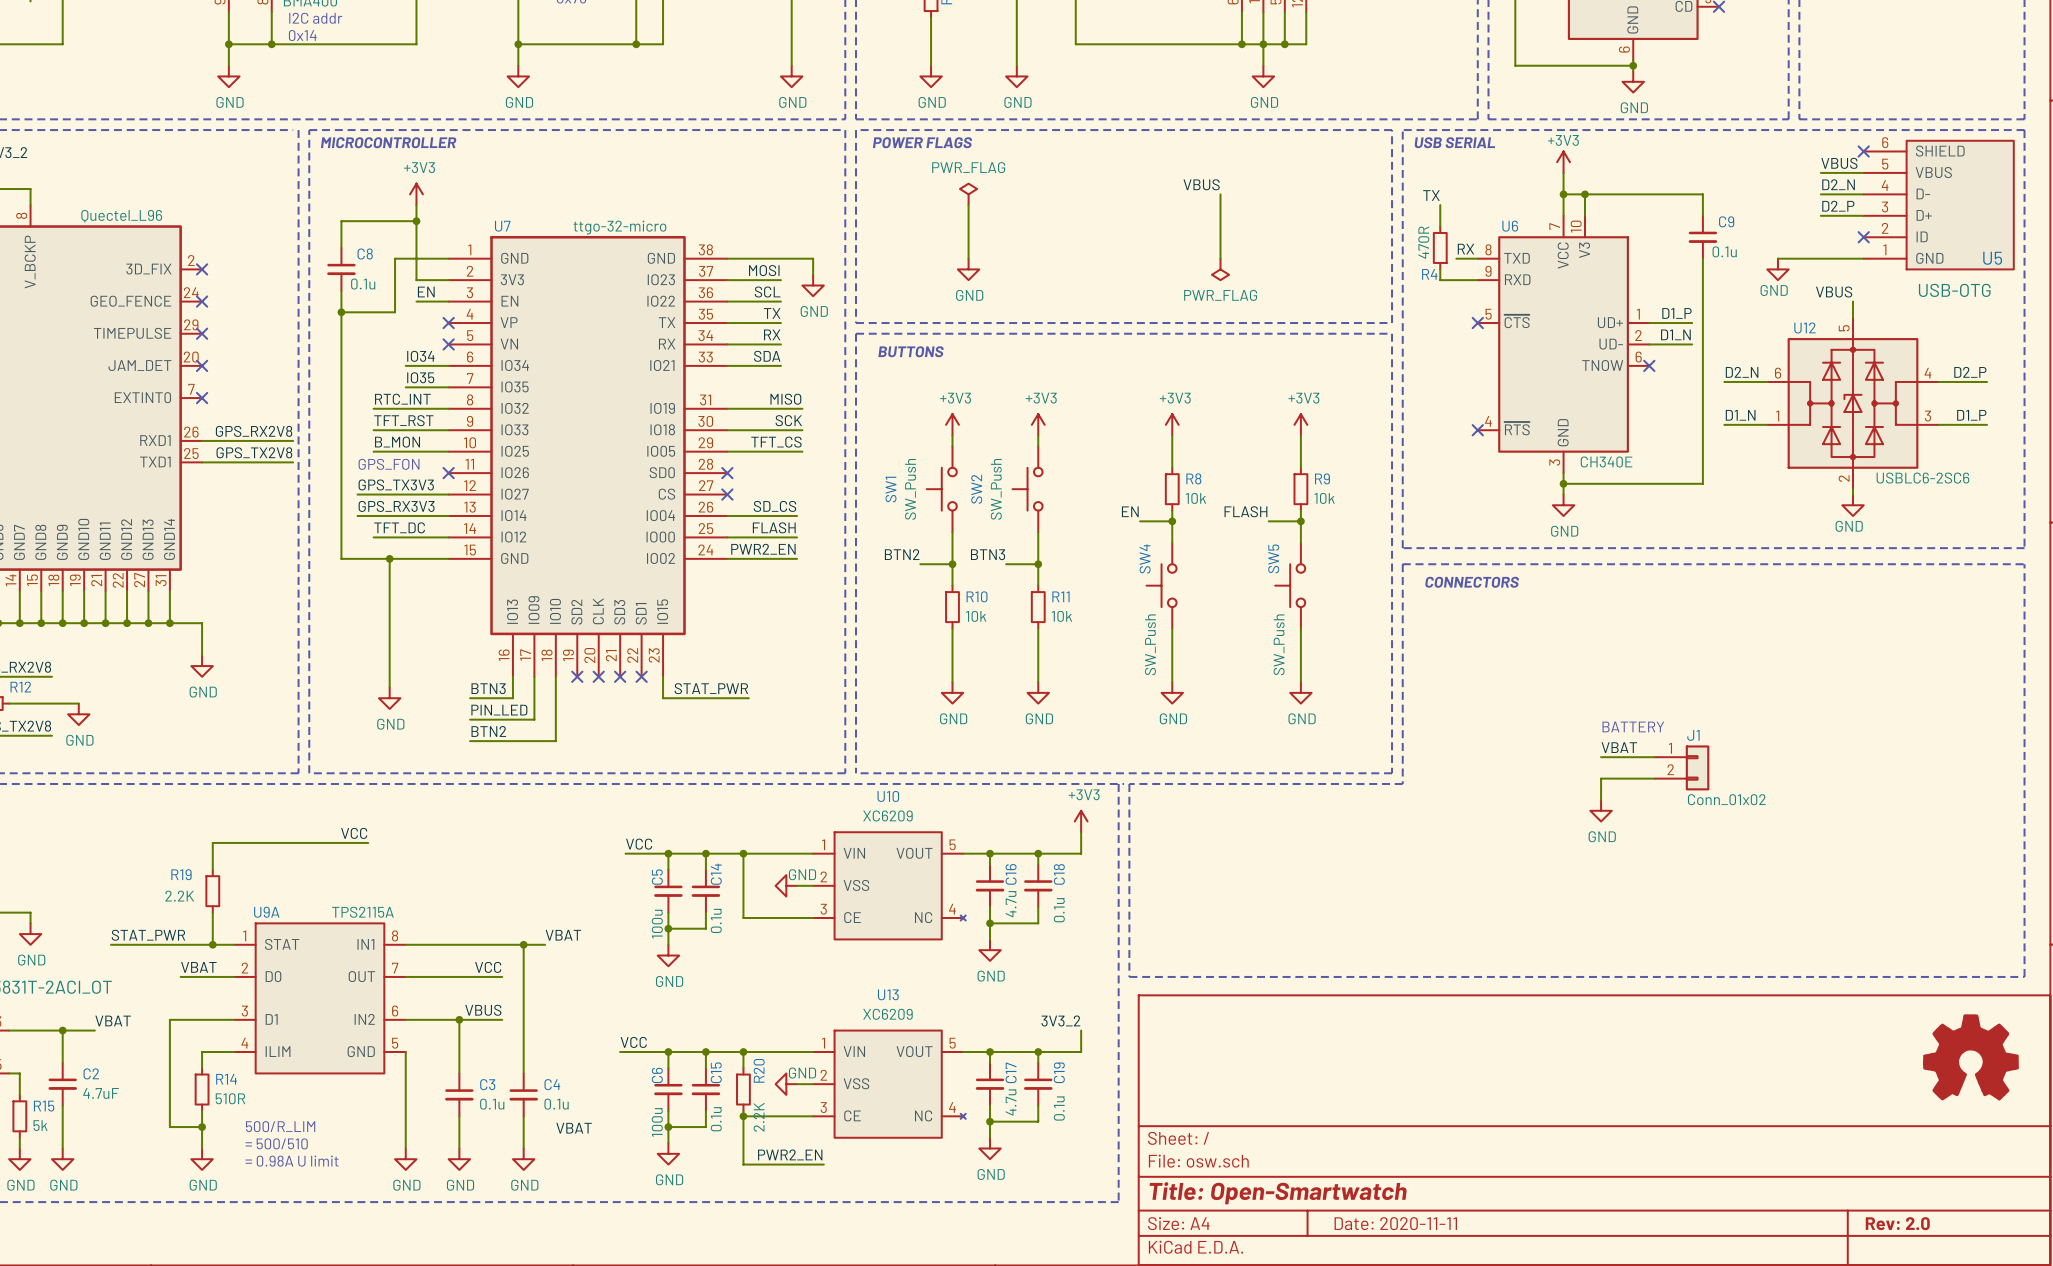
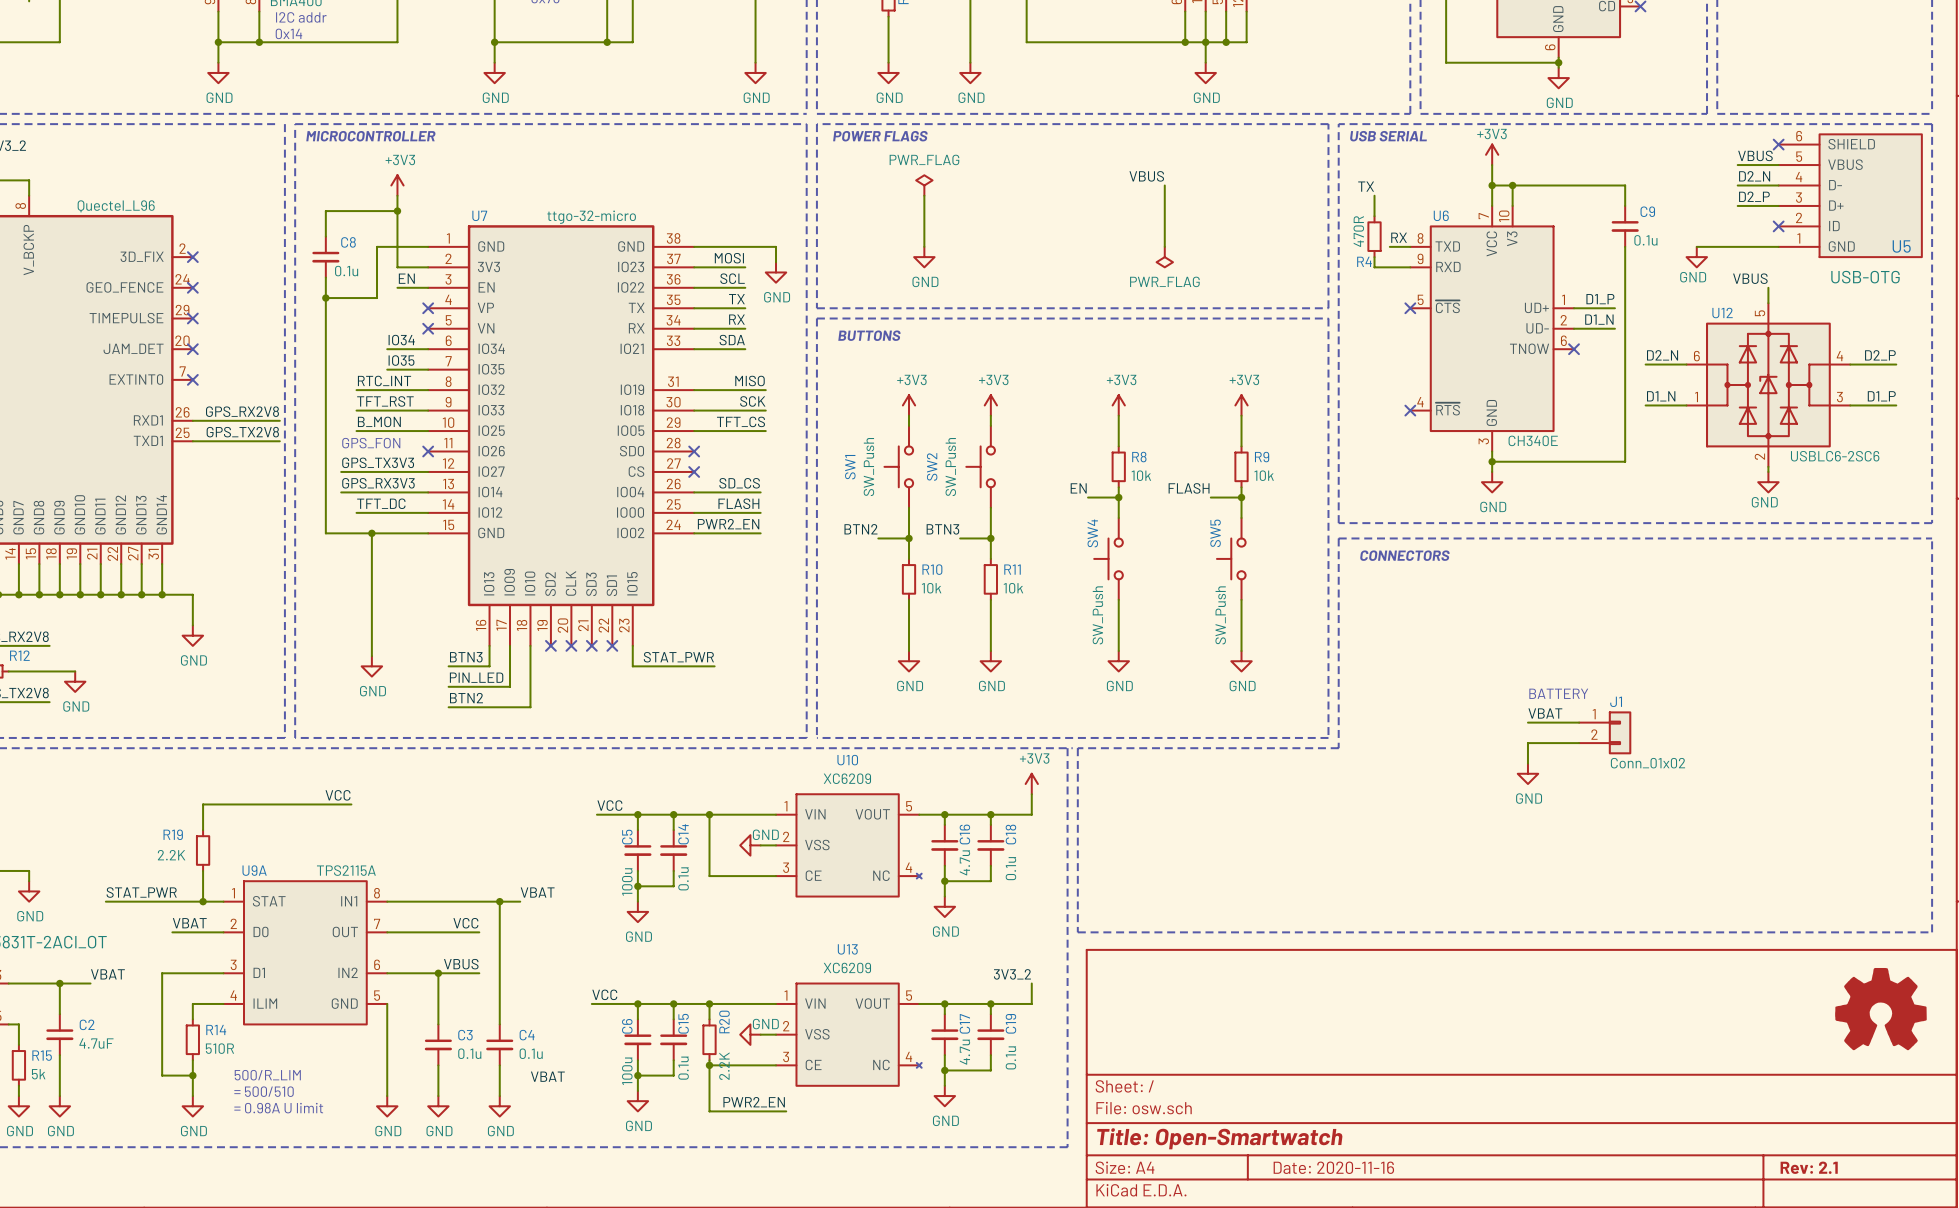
title block: Date: 2020-11-11 (1395, 1223) -> Date: 2020-11-16 (1333, 1167)
title block: Rev: 2.0 (1897, 1223) -> Rev: 2.1 (1809, 1167)

